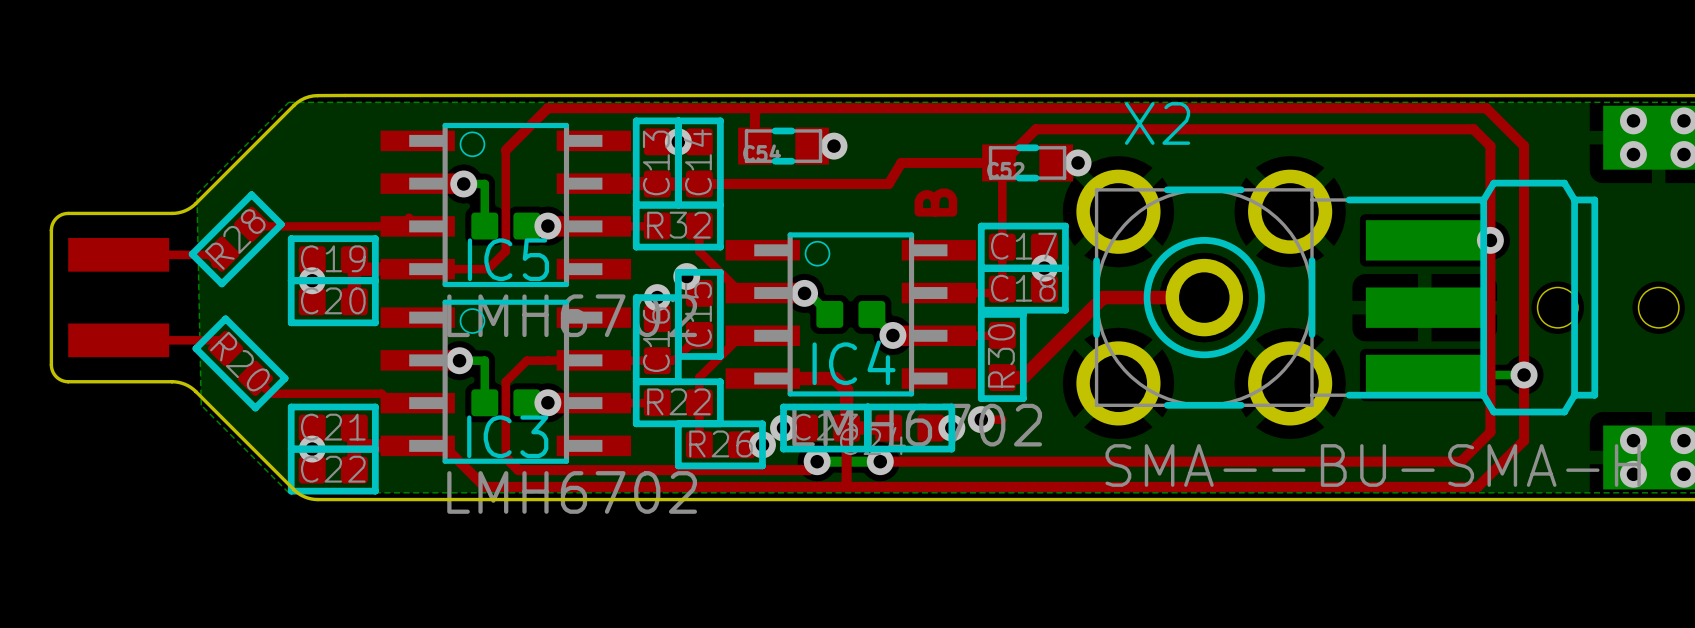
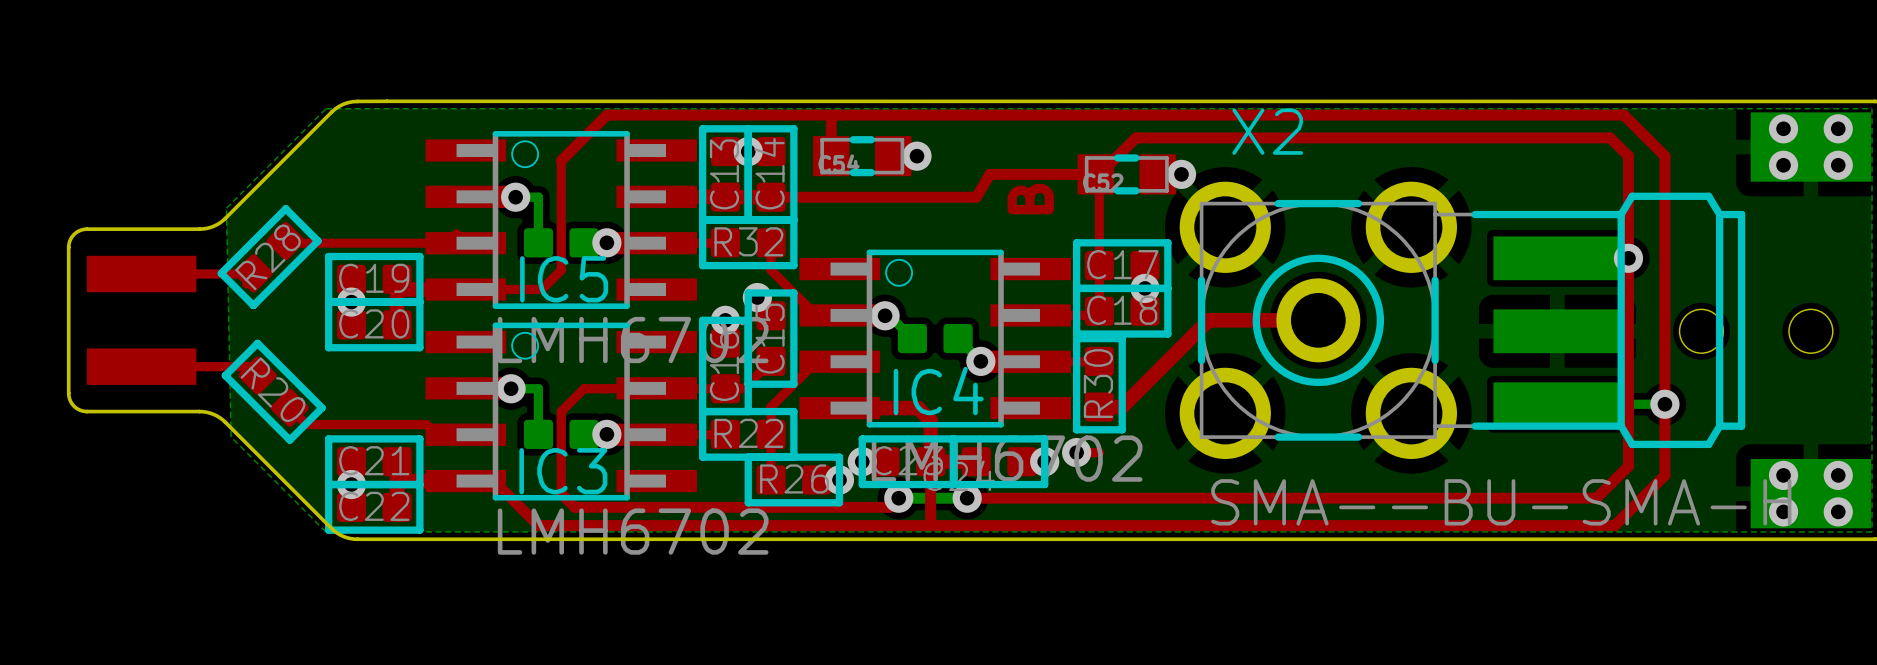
text position: B (935, 202) -> B (1030, 199)

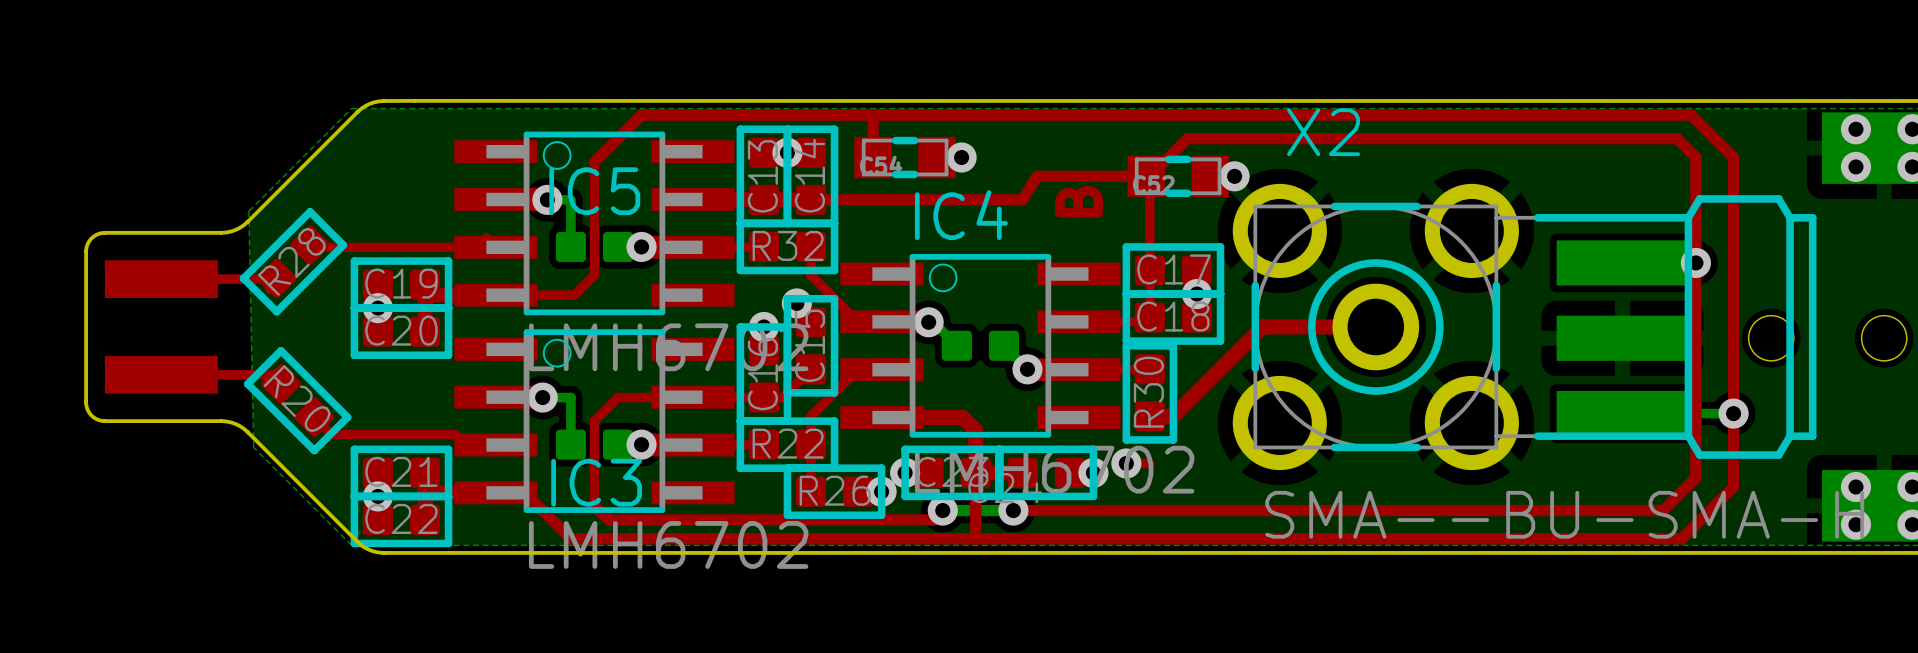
IC5 name position: IC5 (564, 279) -> IC5 (594, 191)
IC4 name position: IC4 (938, 391) -> IC4 (961, 215)

